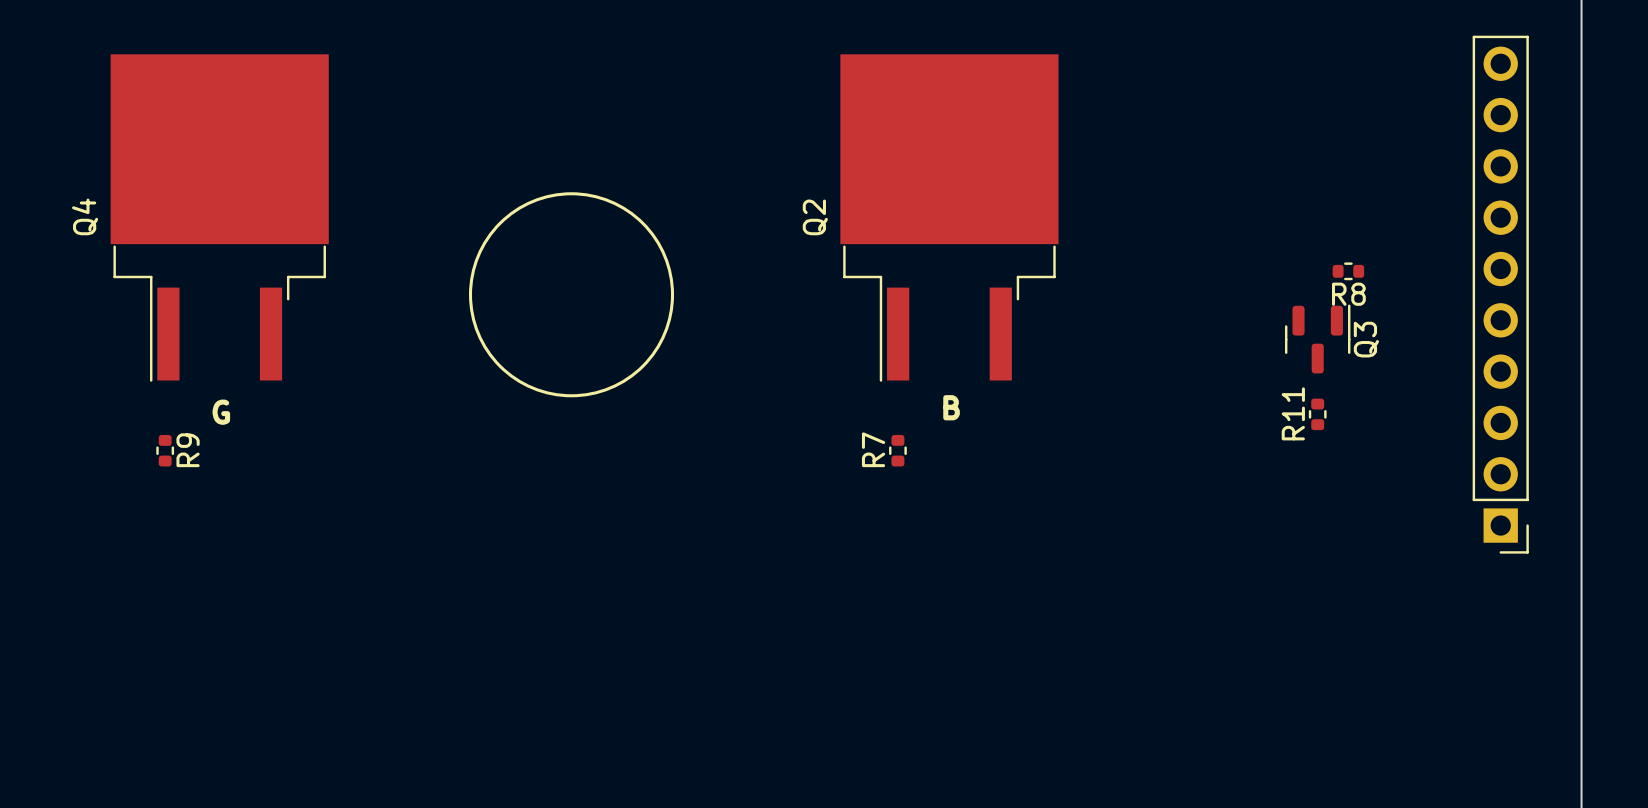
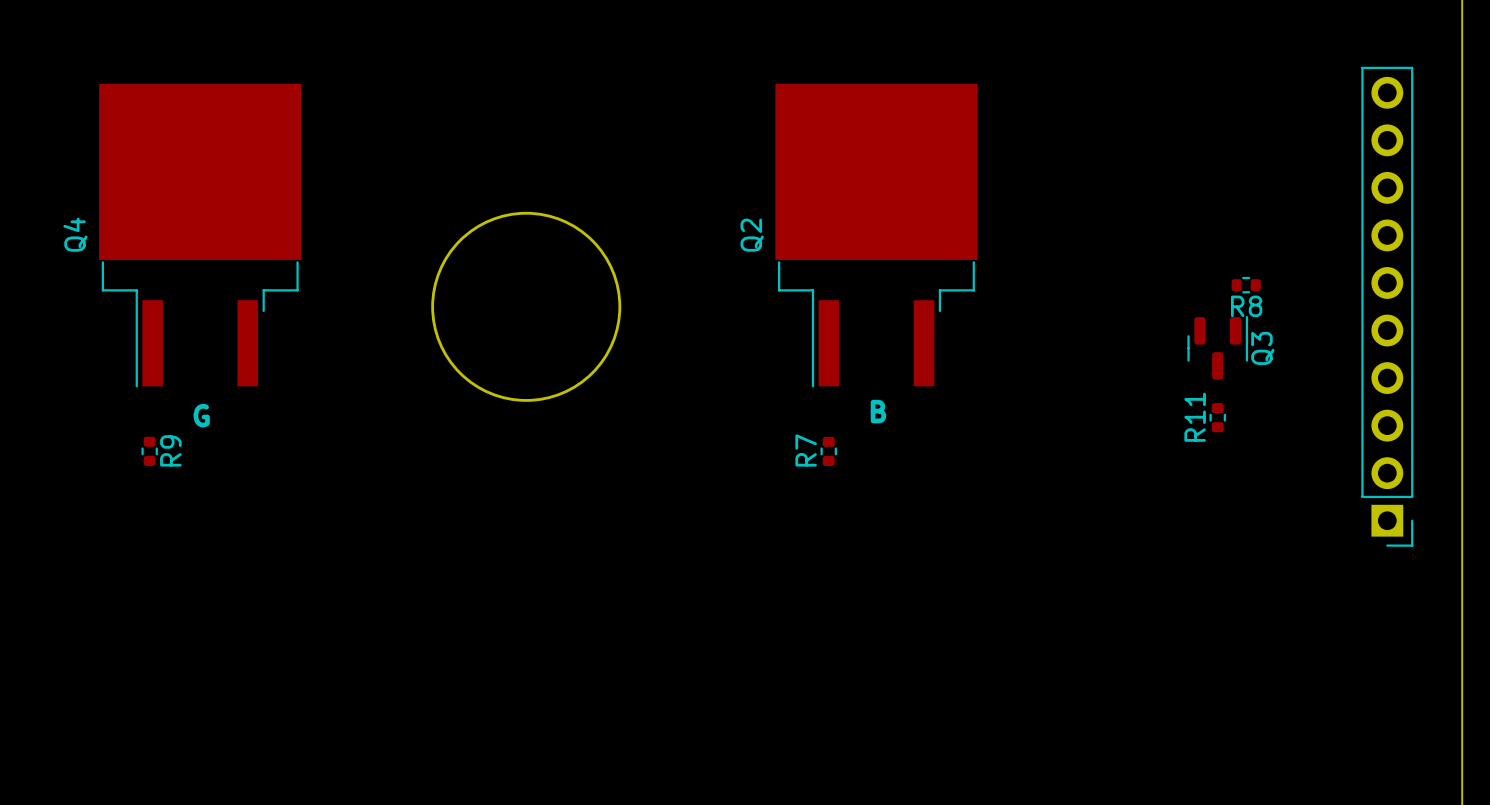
drawing: [468, 192, 675, 398] -> none
round board edge: none -> [431, 211, 622, 402]

